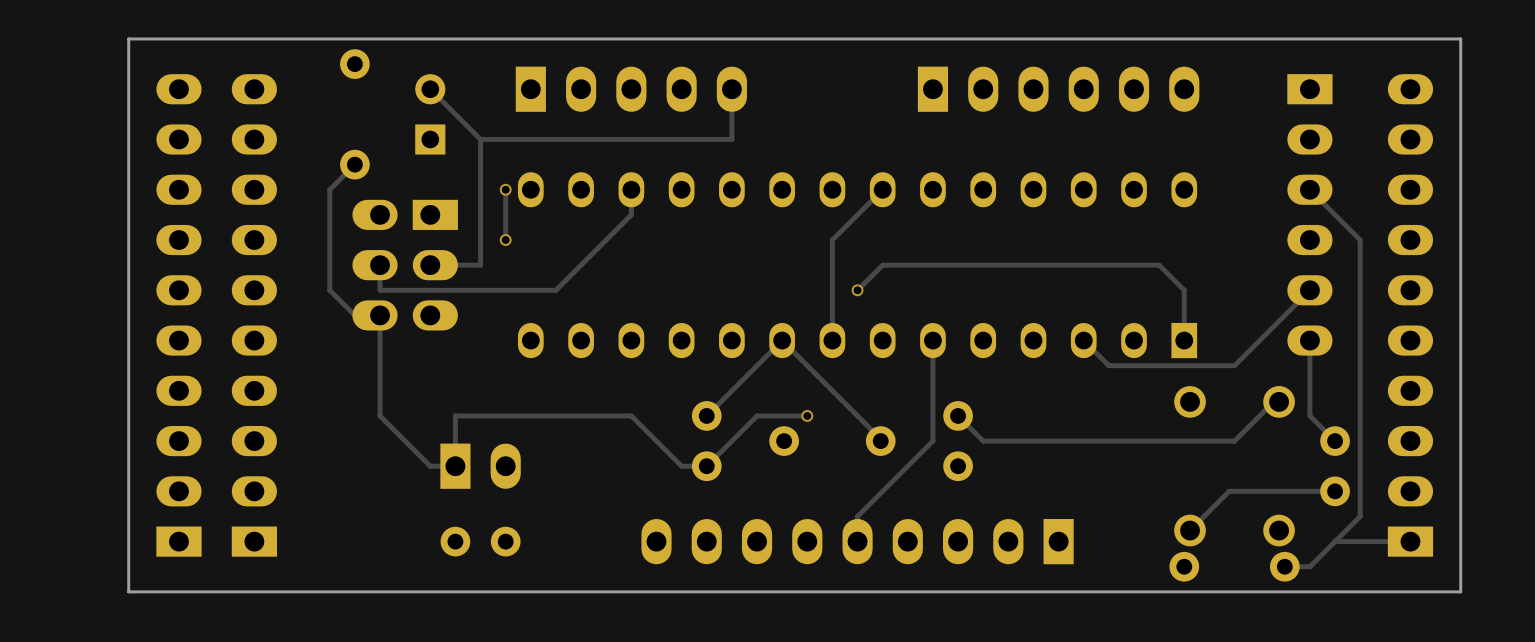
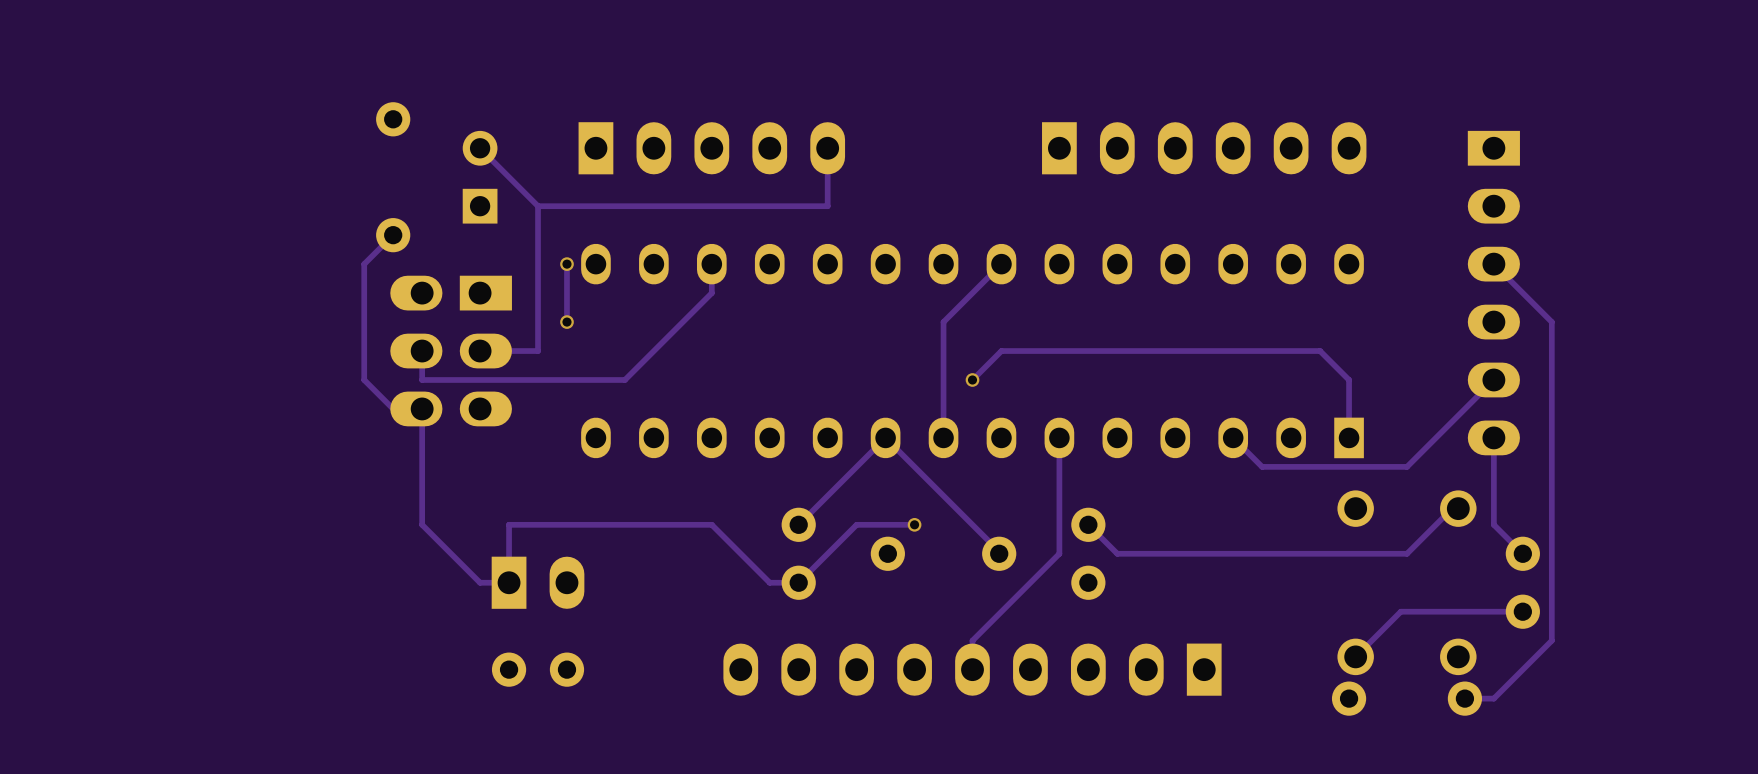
board edge: (1460, 38) (128, 38) (128, 591) (1460, 591) (1460, 38) -> none
part: (178, 315) -> none
part: (254, 315) -> none
part: (1410, 315) -> none
track: (1410, 541) (1335, 541) -> none

